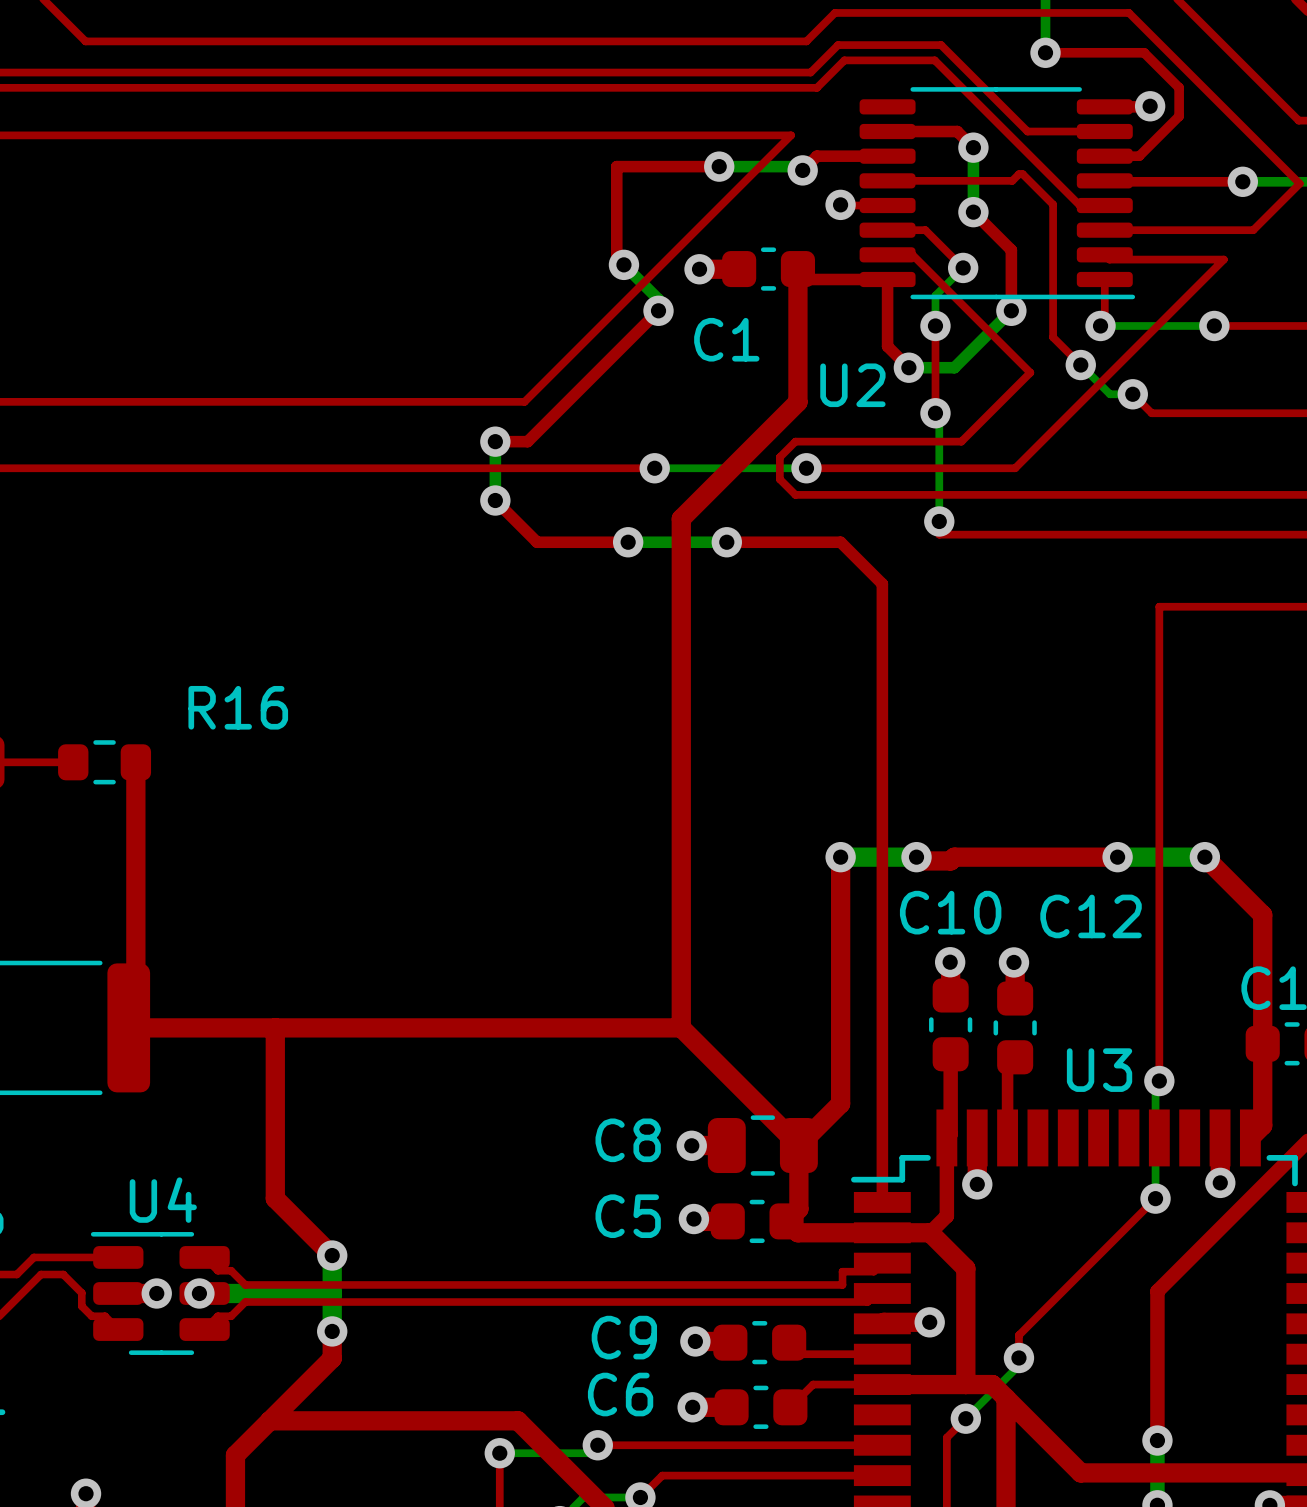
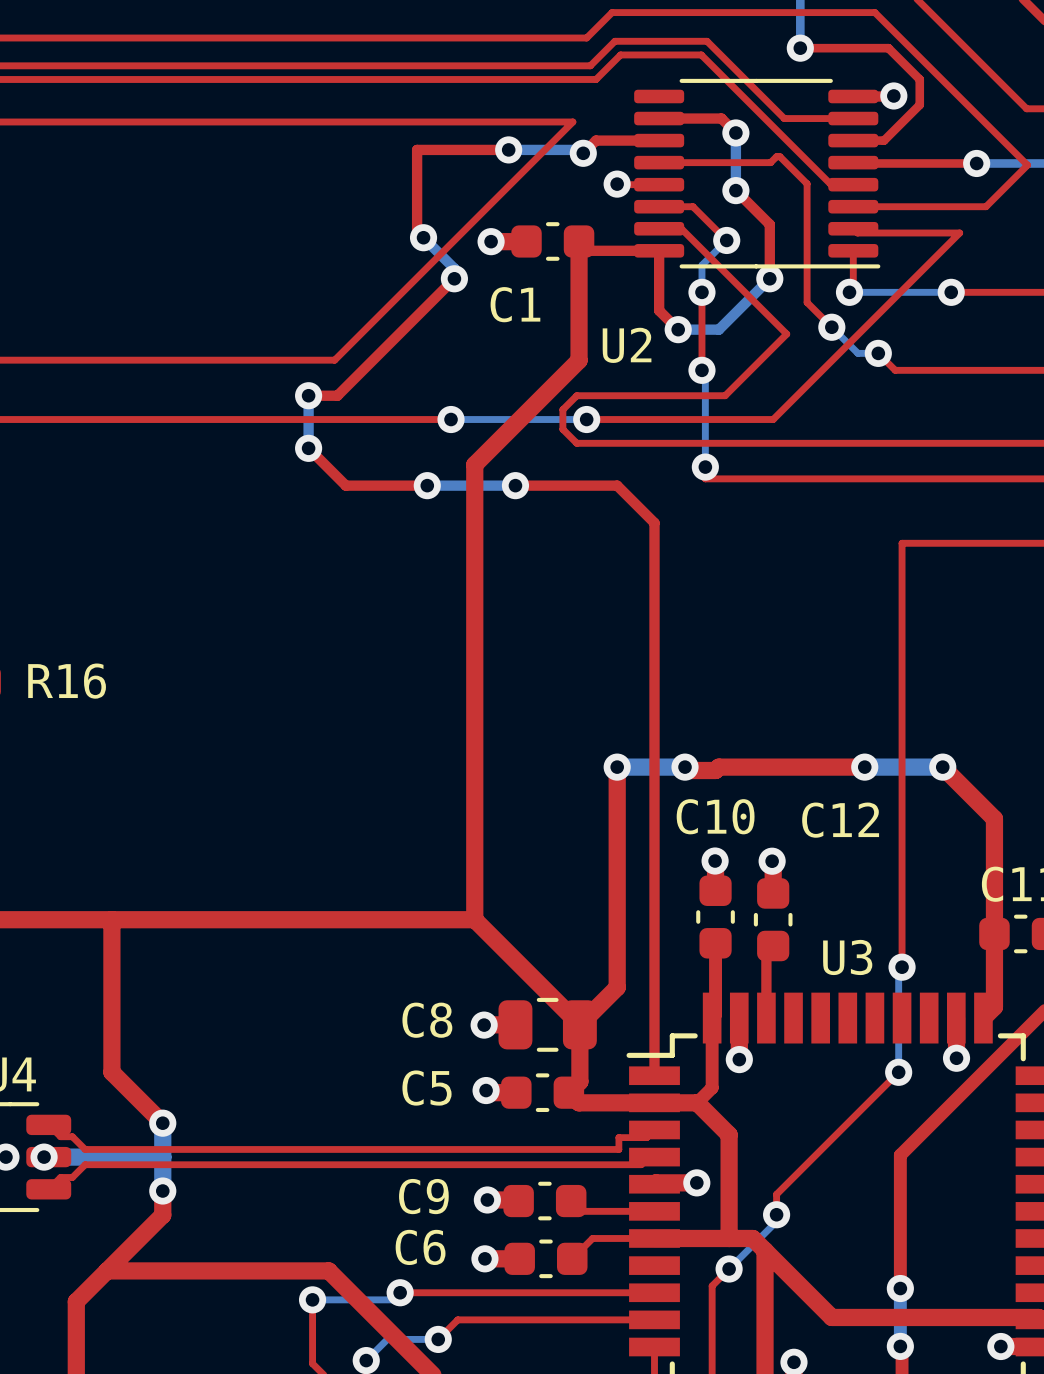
R16 name position: R16 (238, 707) -> R16 (67, 681)

